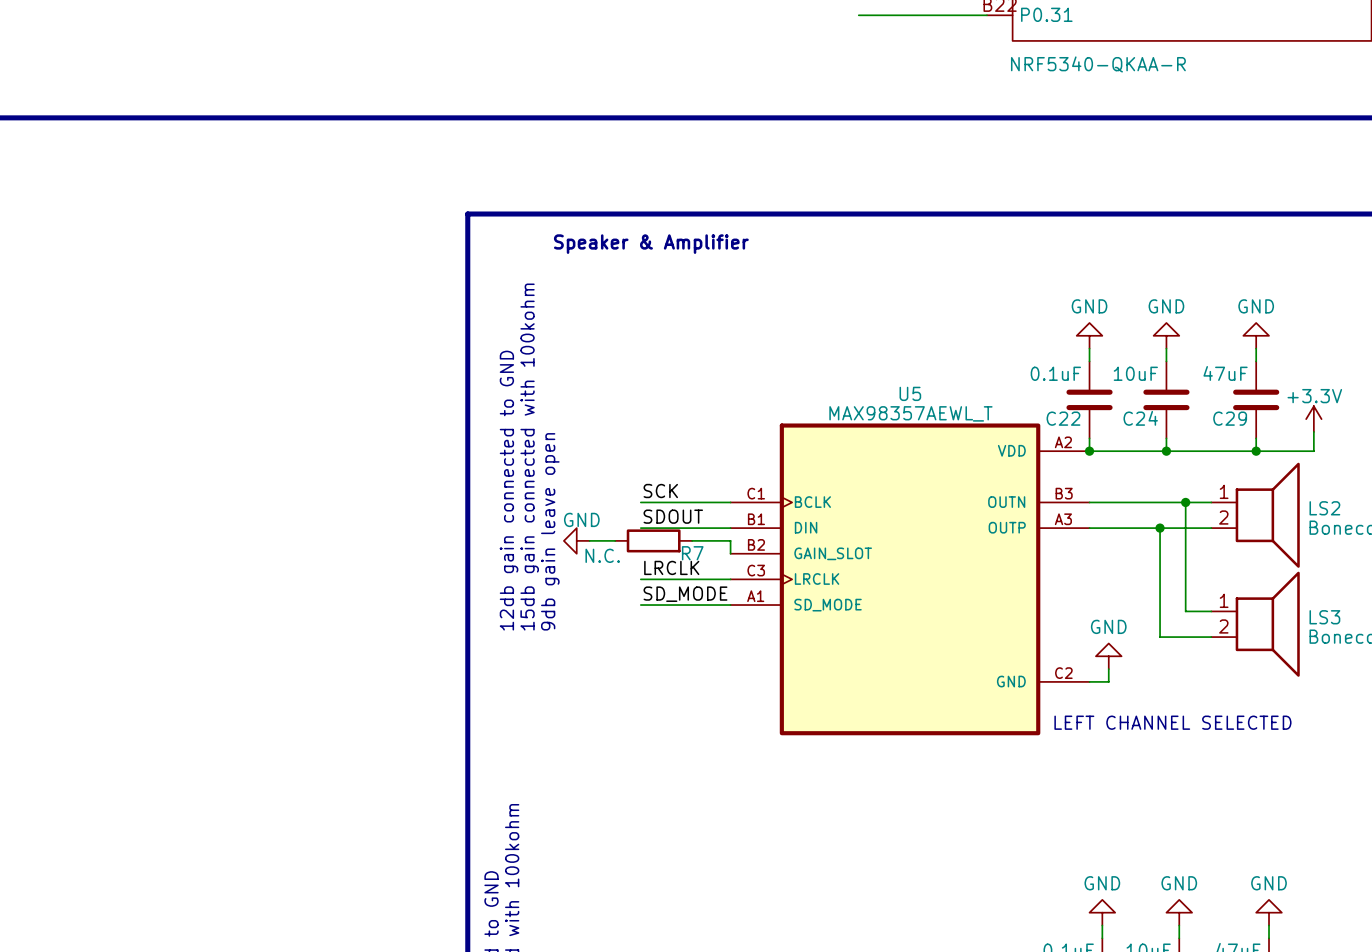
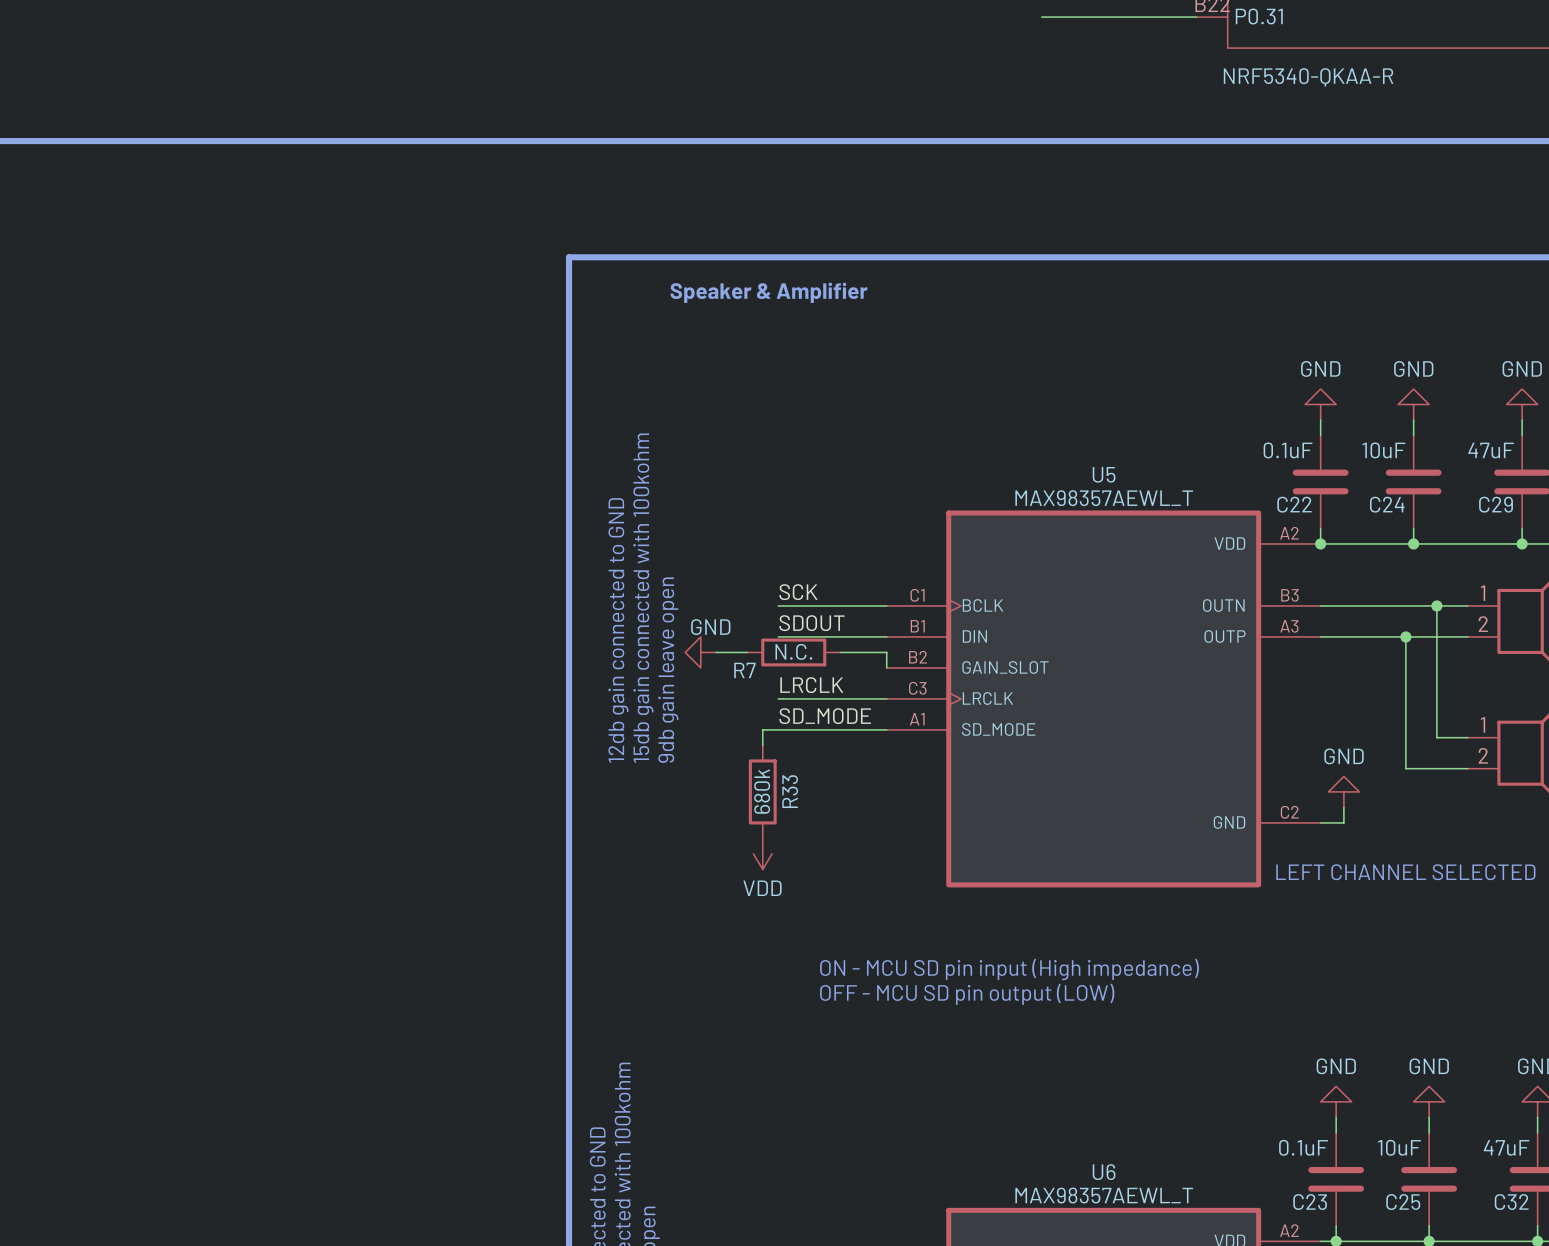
R7 name position: R7 (692, 553) -> R7 (744, 670)
R7 value position: N.C. (602, 555) -> N.C. (793, 651)
wire: none -> (778, 729) (762, 729) (762, 745)
R33: none -> 680k (762, 791)
power symbol: none -> VDD (762, 853)
text: none -> ON - MCU SD pin input (High impedance) (1009, 969)
text: none -> OFF - MCU SD pin output (LOW) (967, 994)

